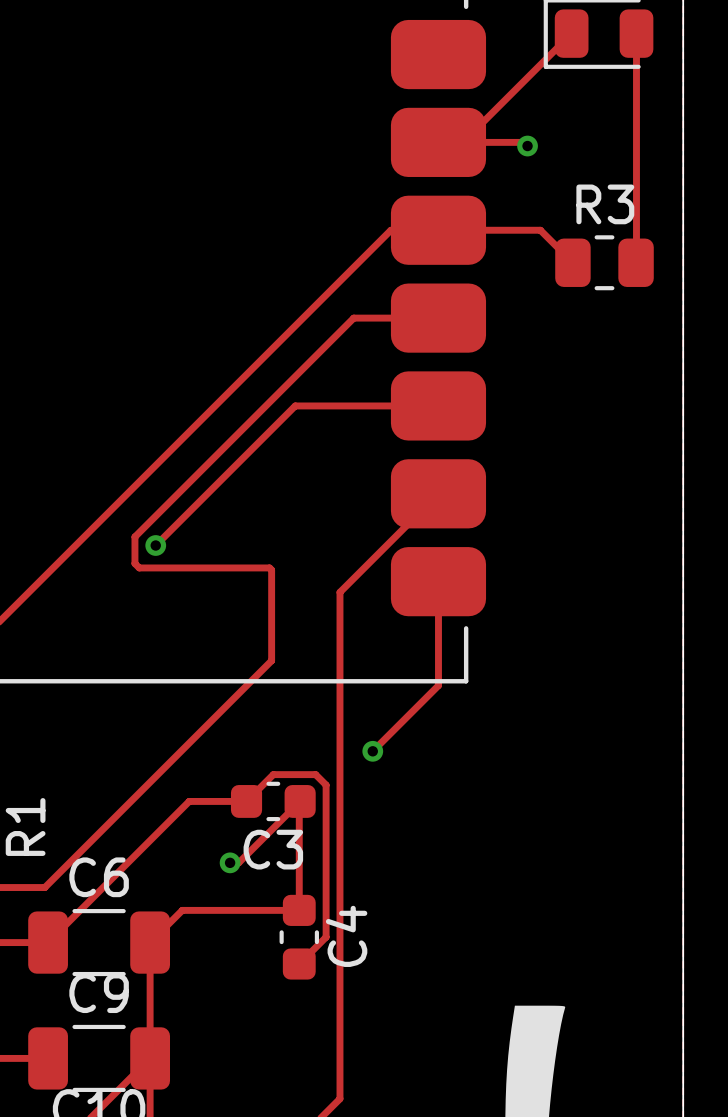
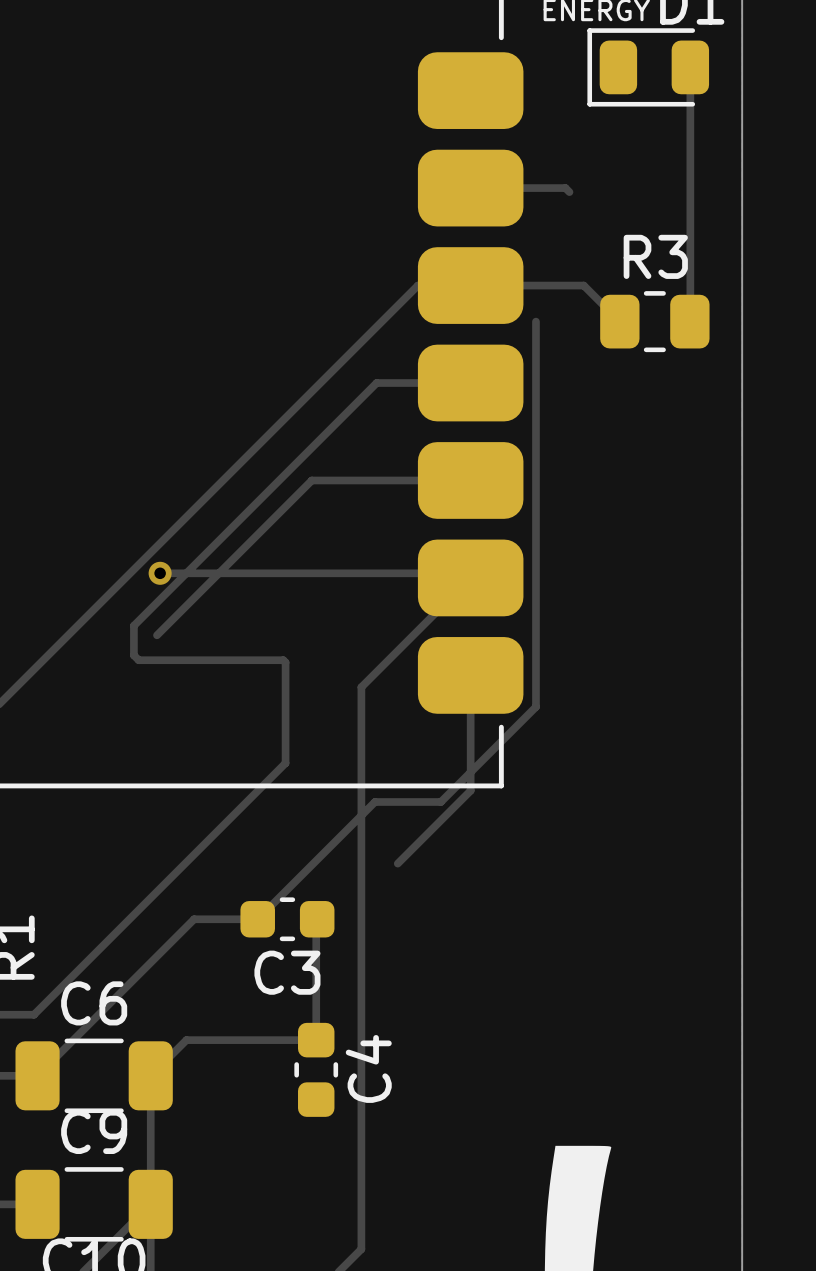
track: (571, 33) (462, 142) -> none
via: (527, 146) -> none
track: none -> (160, 573) (466, 573) (470, 577)
via position: (155, 545) -> (160, 573)
via: (372, 751) -> none
track: (273, 774) (315, 774) (326, 785) (326, 937) (299, 964) -> (287, 889) (374, 801) (440, 801) (535, 706) (535, 321)
track: (300, 801) (238, 862) (230, 862) -> none
via: (230, 862) -> none

